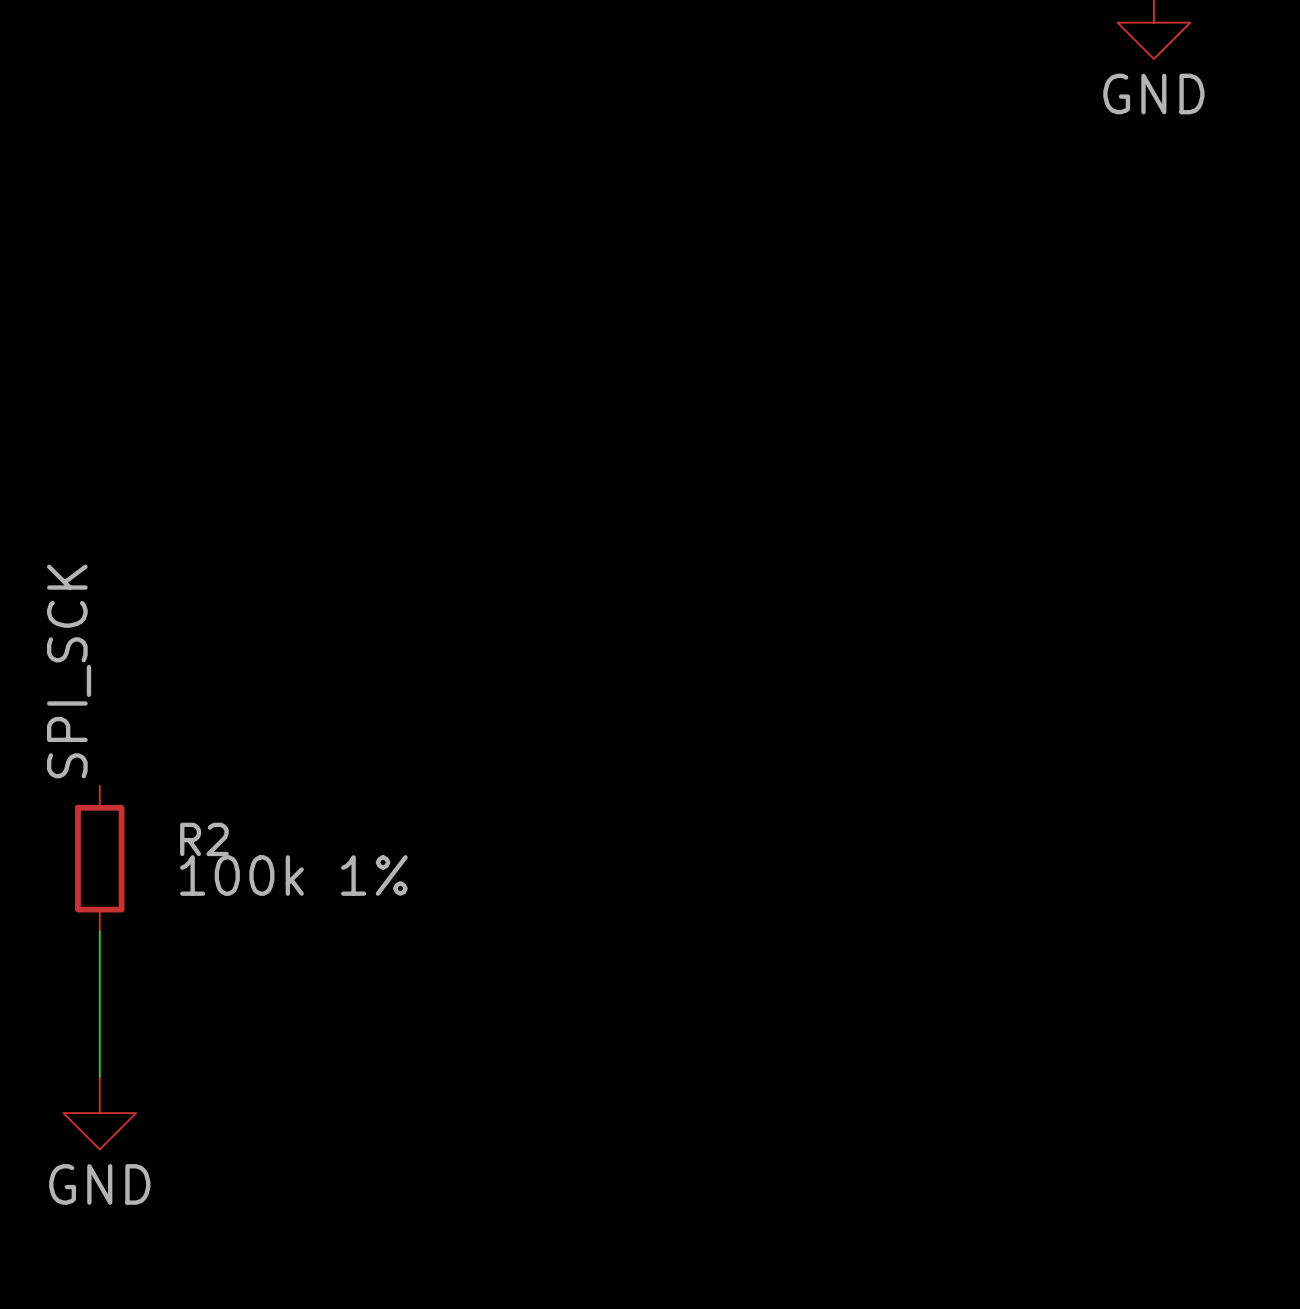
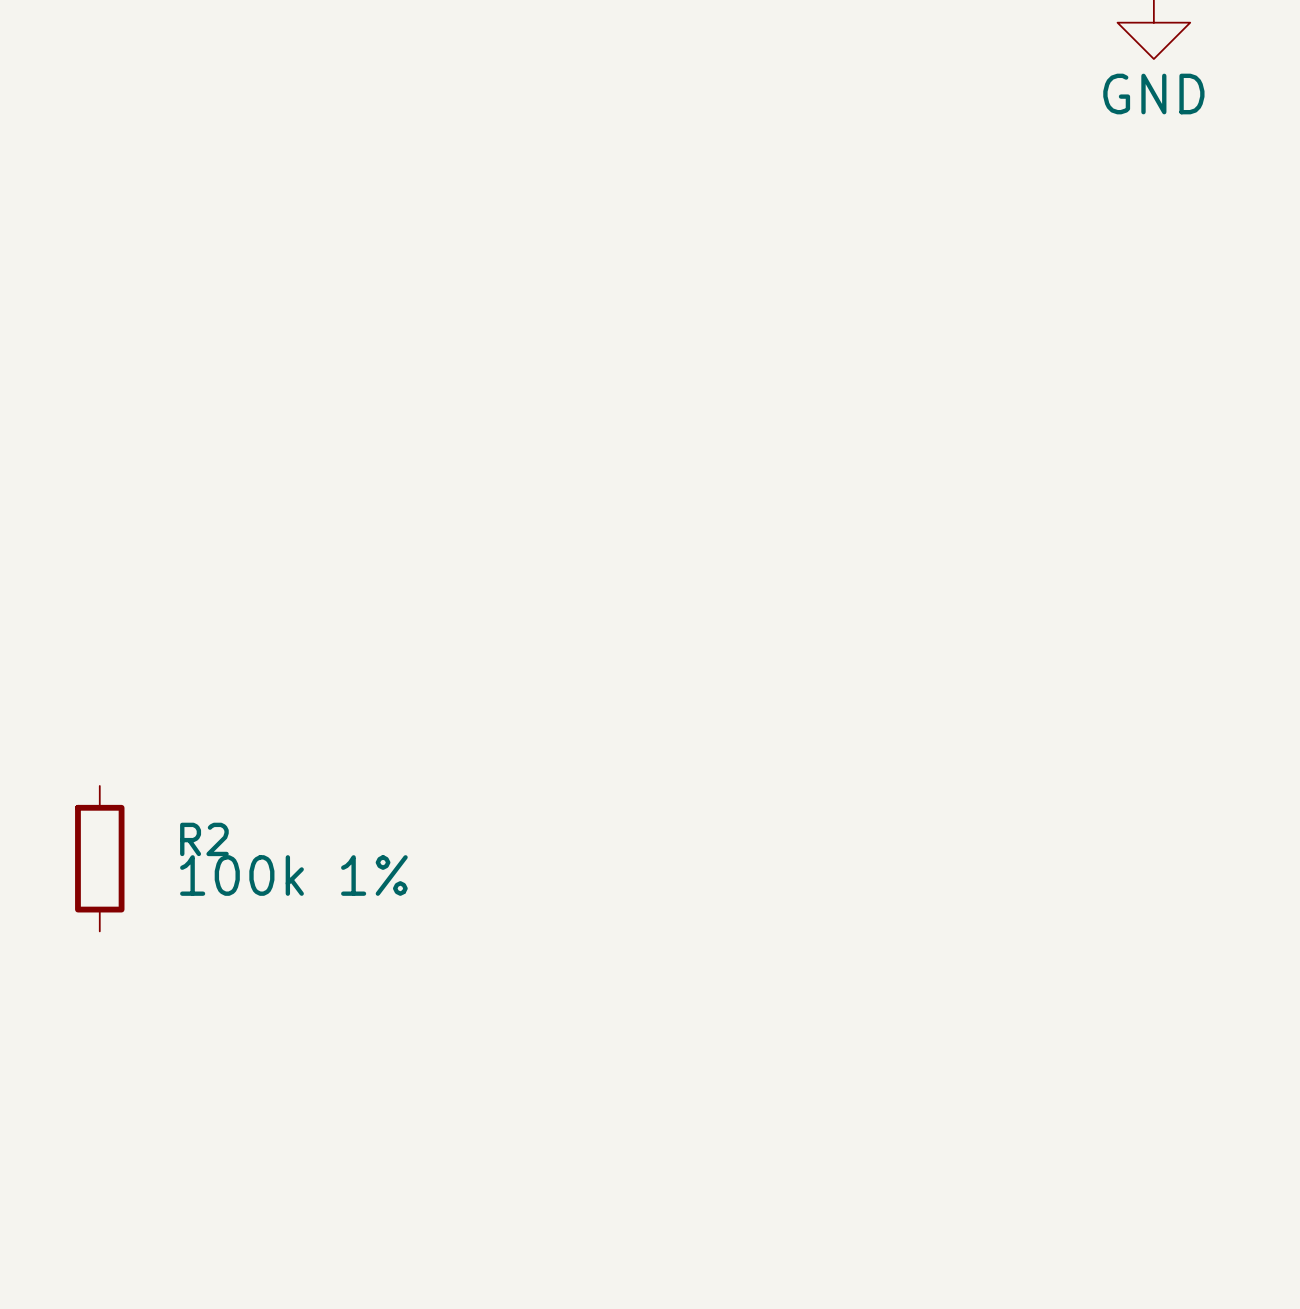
label: SPI_SCK (69, 671) -> none
wire: (99, 931) (99, 1076) -> none
power symbol: GND (99, 1113) -> none

